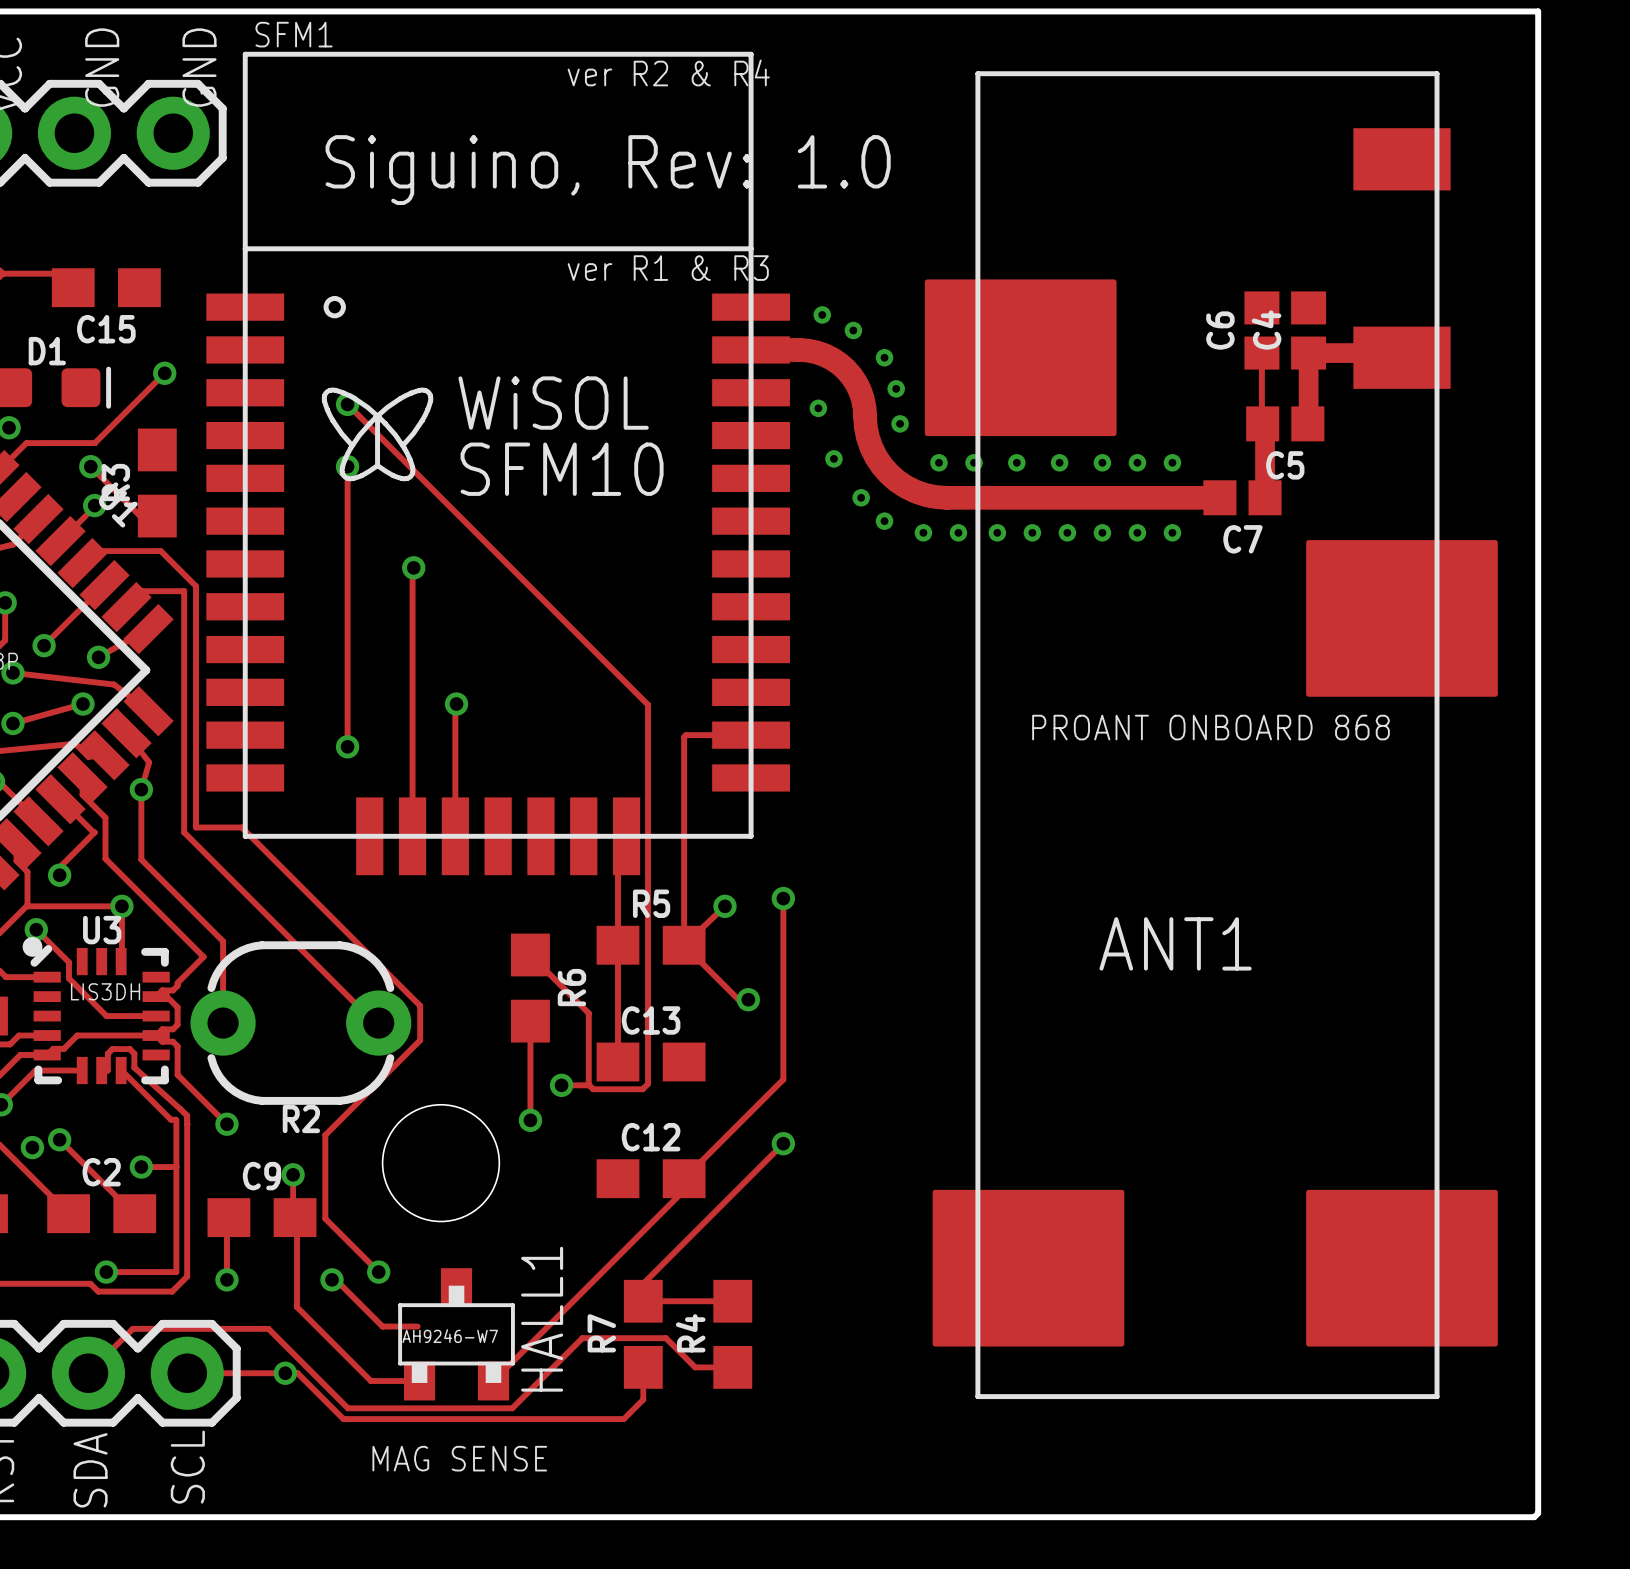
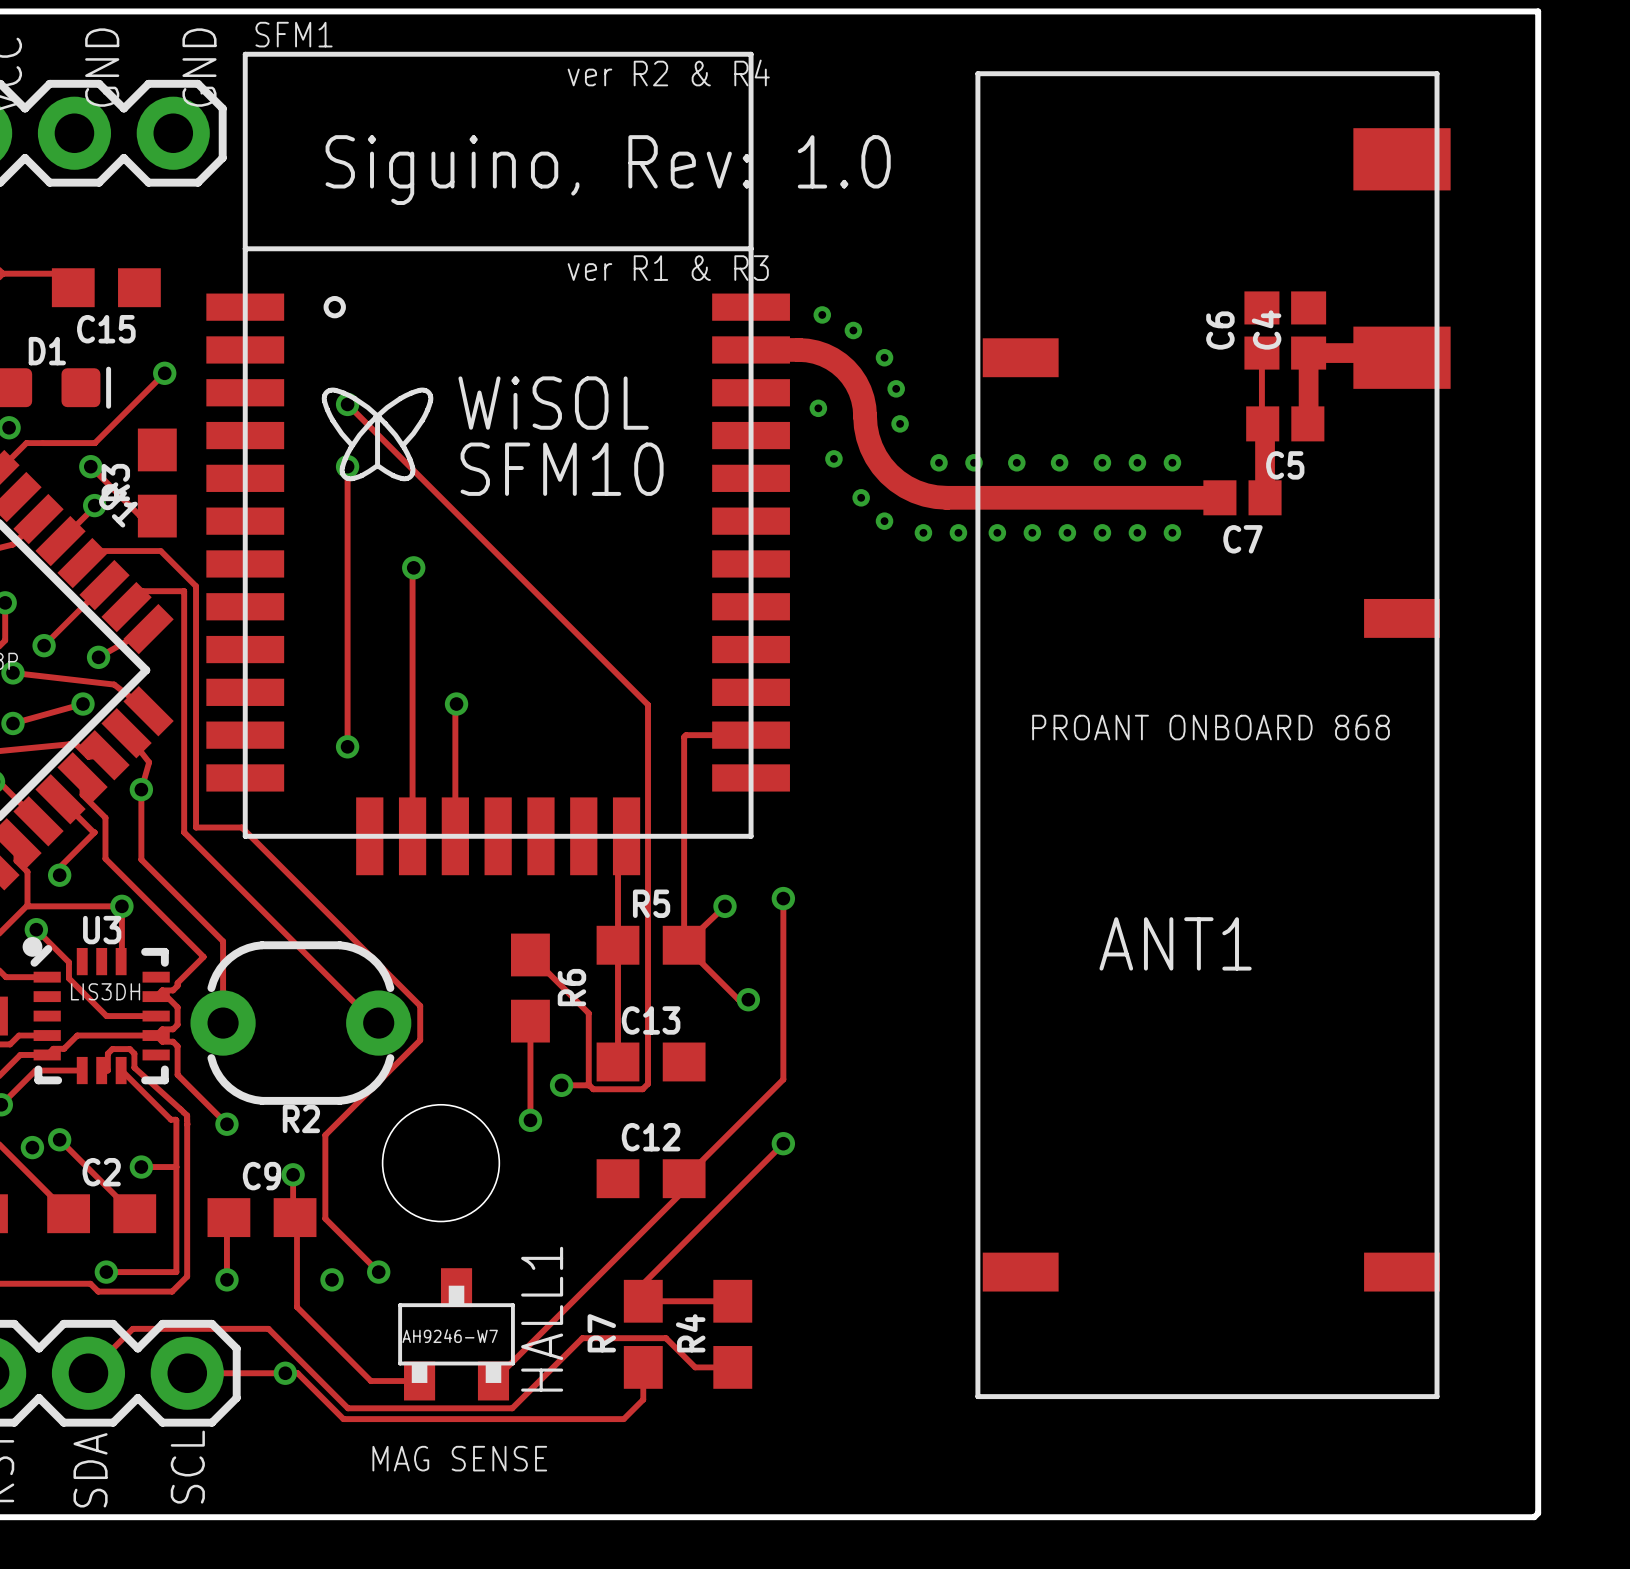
ANT1 footprint: [924, 71, 1498, 1400] -> [975, 71, 1451, 1400]
track: (332, 1279) (335, 1279) (382, 1326) (417, 1326) -> none

